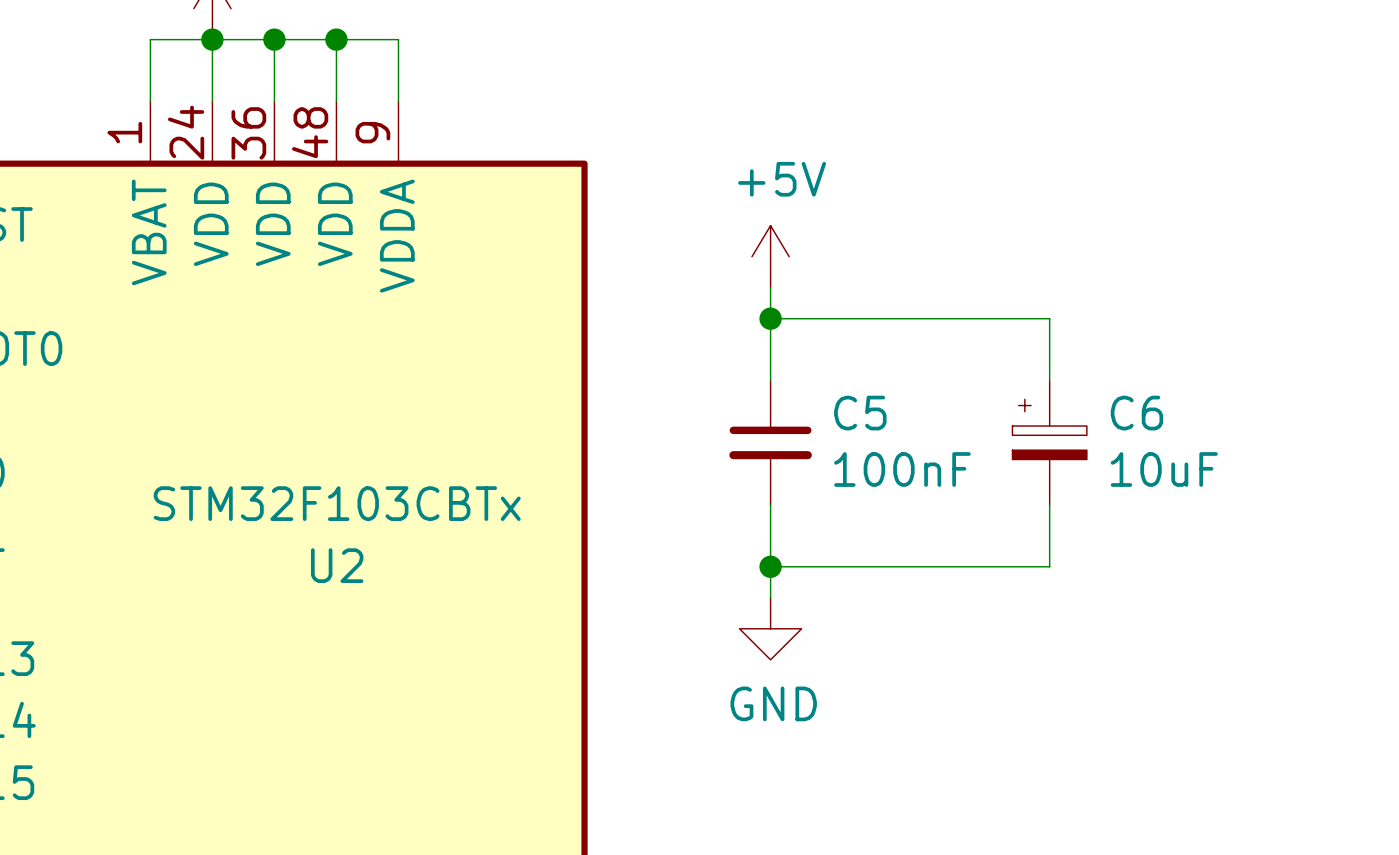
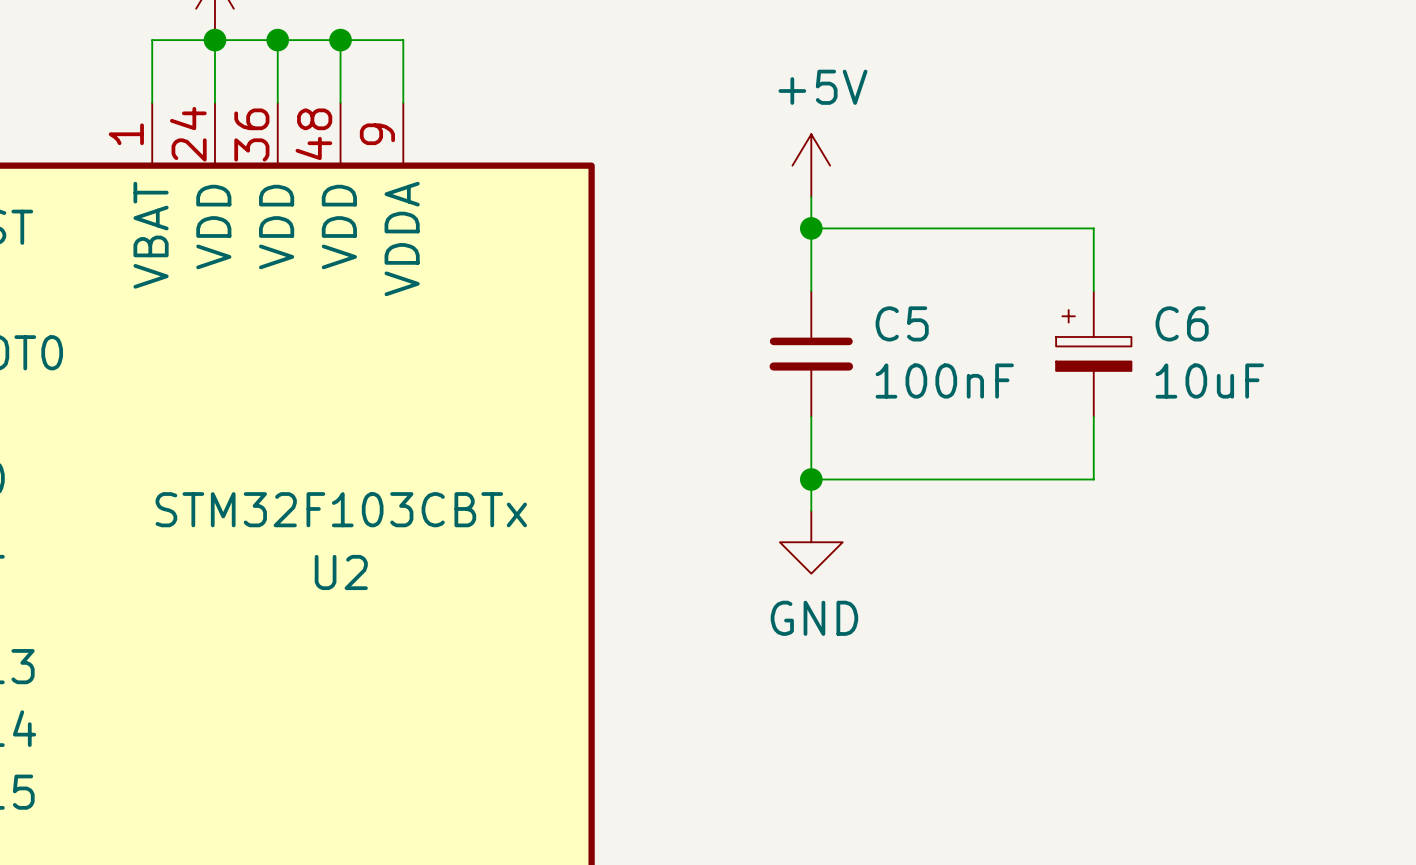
junction: none -> (811, 228)
power symbol position: +5V (770, 256) -> +5V (811, 165)
wire: (770, 287) (770, 380) -> (811, 197) (811, 291)
wire: (770, 318) (1049, 318) (1049, 380) -> (811, 228) (1093, 228) (1093, 291)
junction: (770, 318) -> none
C5 position: (770, 442) -> (811, 353)
C6 position: (1049, 442) -> (1093, 353)
junction: none -> (811, 479)
wire: (770, 504) (770, 597) -> (811, 416) (811, 510)
wire: (1049, 504) (1049, 566) (770, 566) -> (1093, 416) (1093, 479) (811, 479)
junction: (770, 566) -> none
power symbol position: GND (770, 628) -> GND (811, 542)

